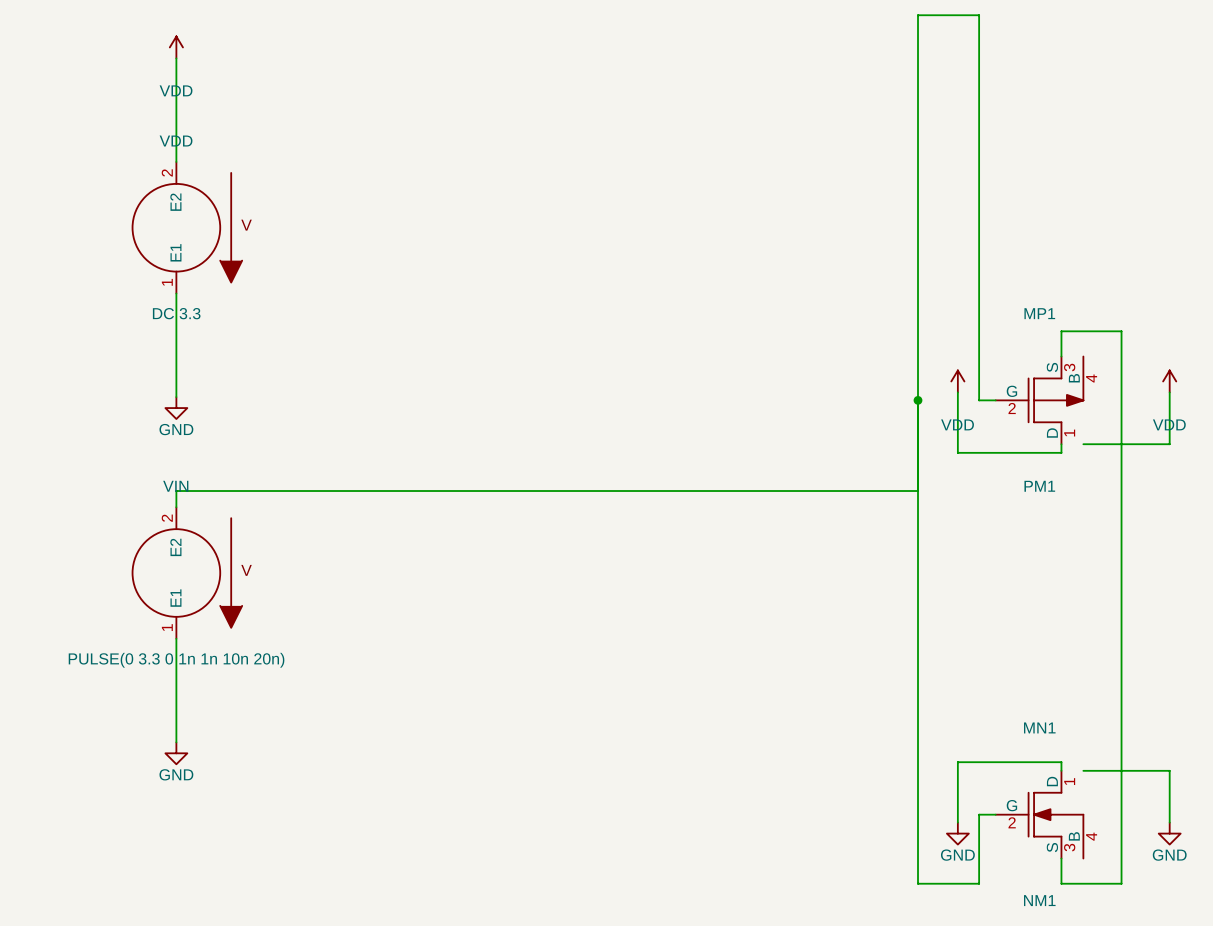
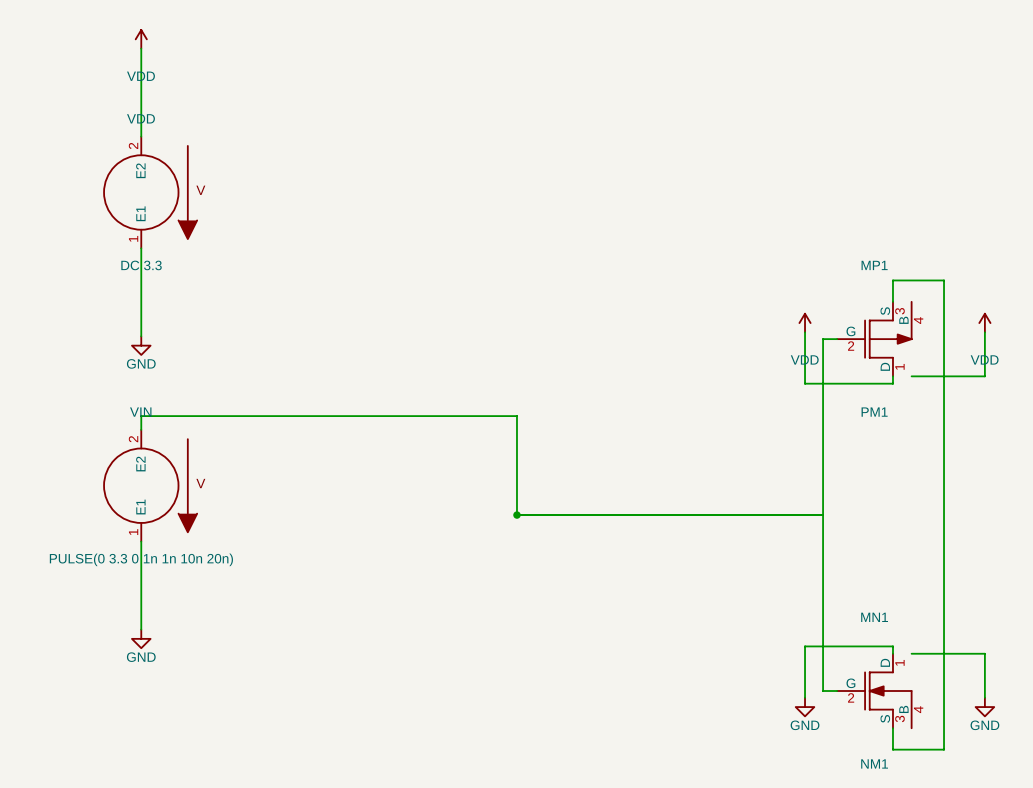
junction: (918, 400) -> none
wire: (979, 400) (979, 15) (918, 15) (918, 883) (979, 883) (979, 814) -> (823, 339) (823, 691)
wire: (618, 491) (918, 491) -> (516, 416) (516, 515) (823, 515)
junction: none -> (516, 515)

